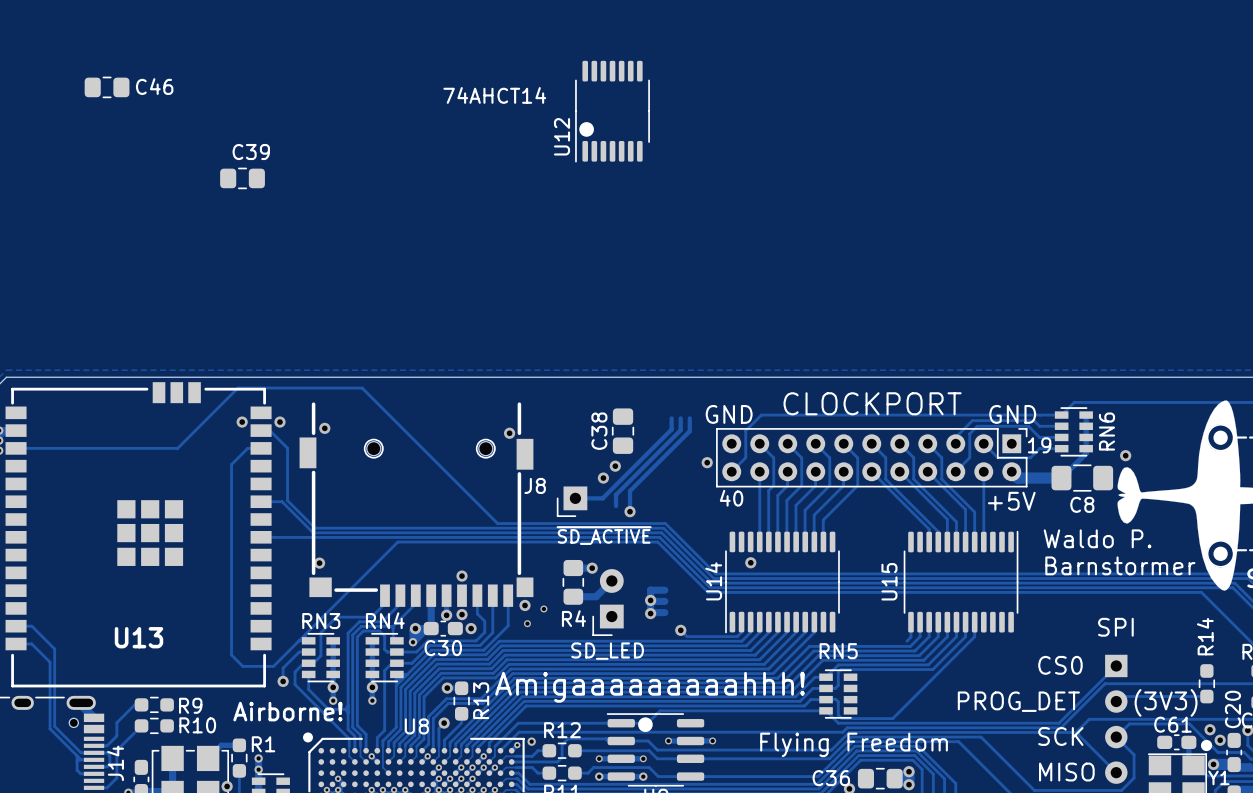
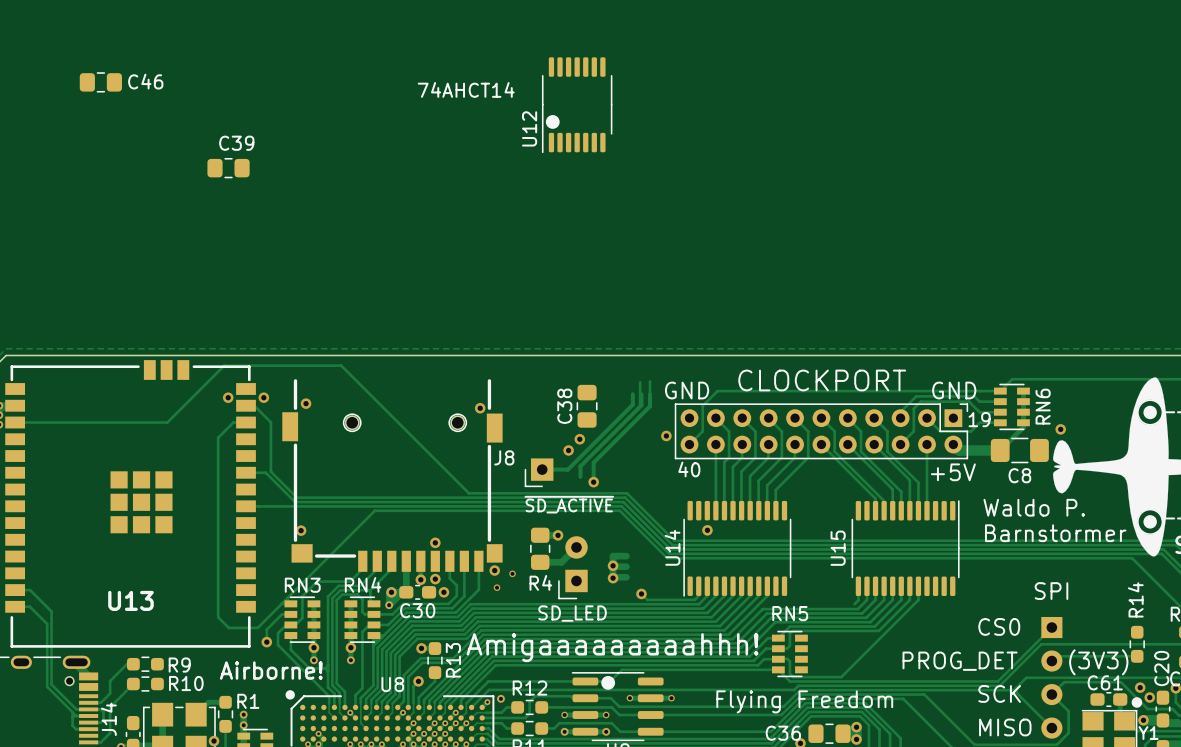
track: none -> (650, 381) (650, 394)
track: none -> (640, 382) (640, 406)

